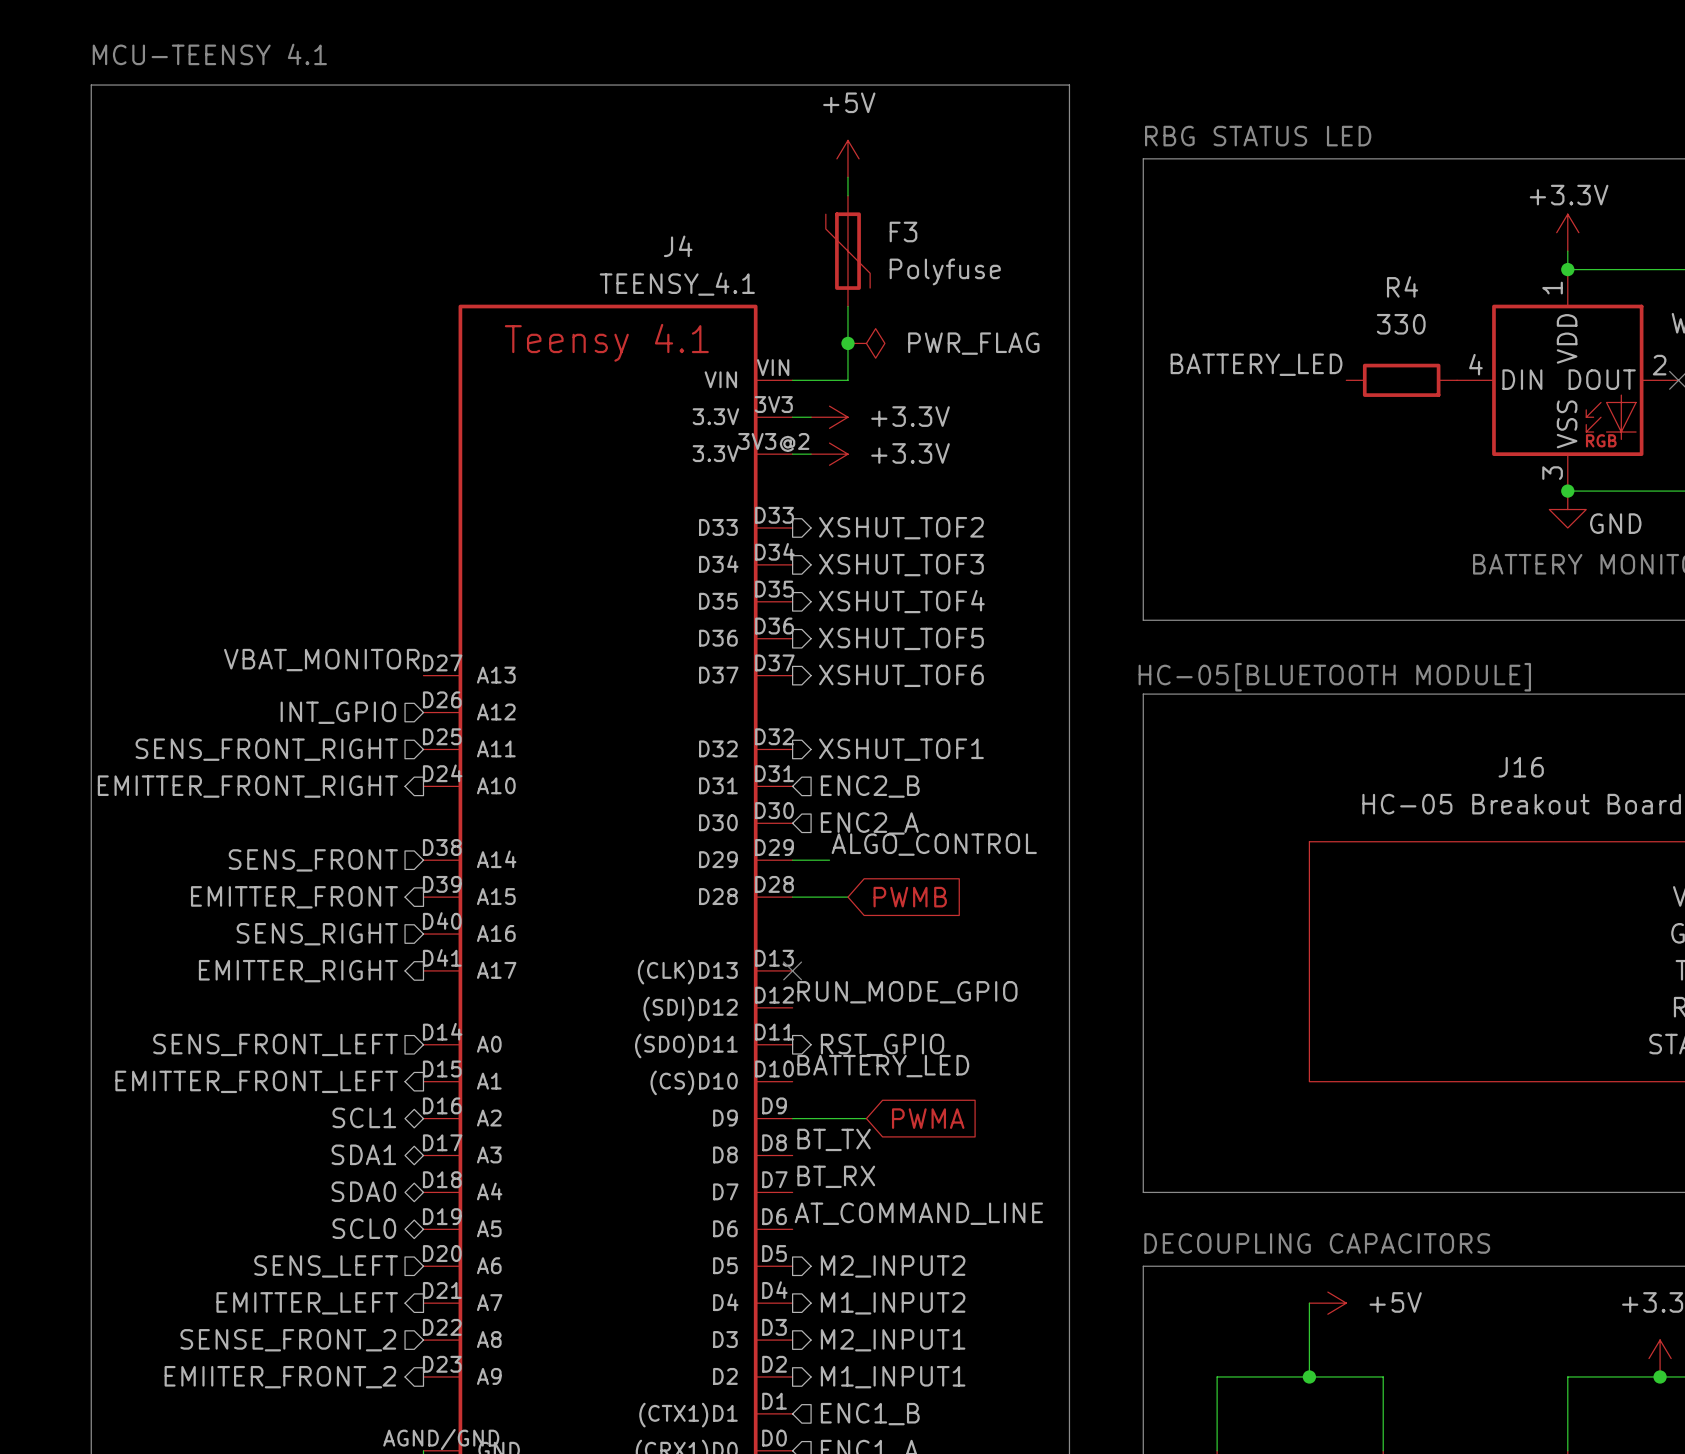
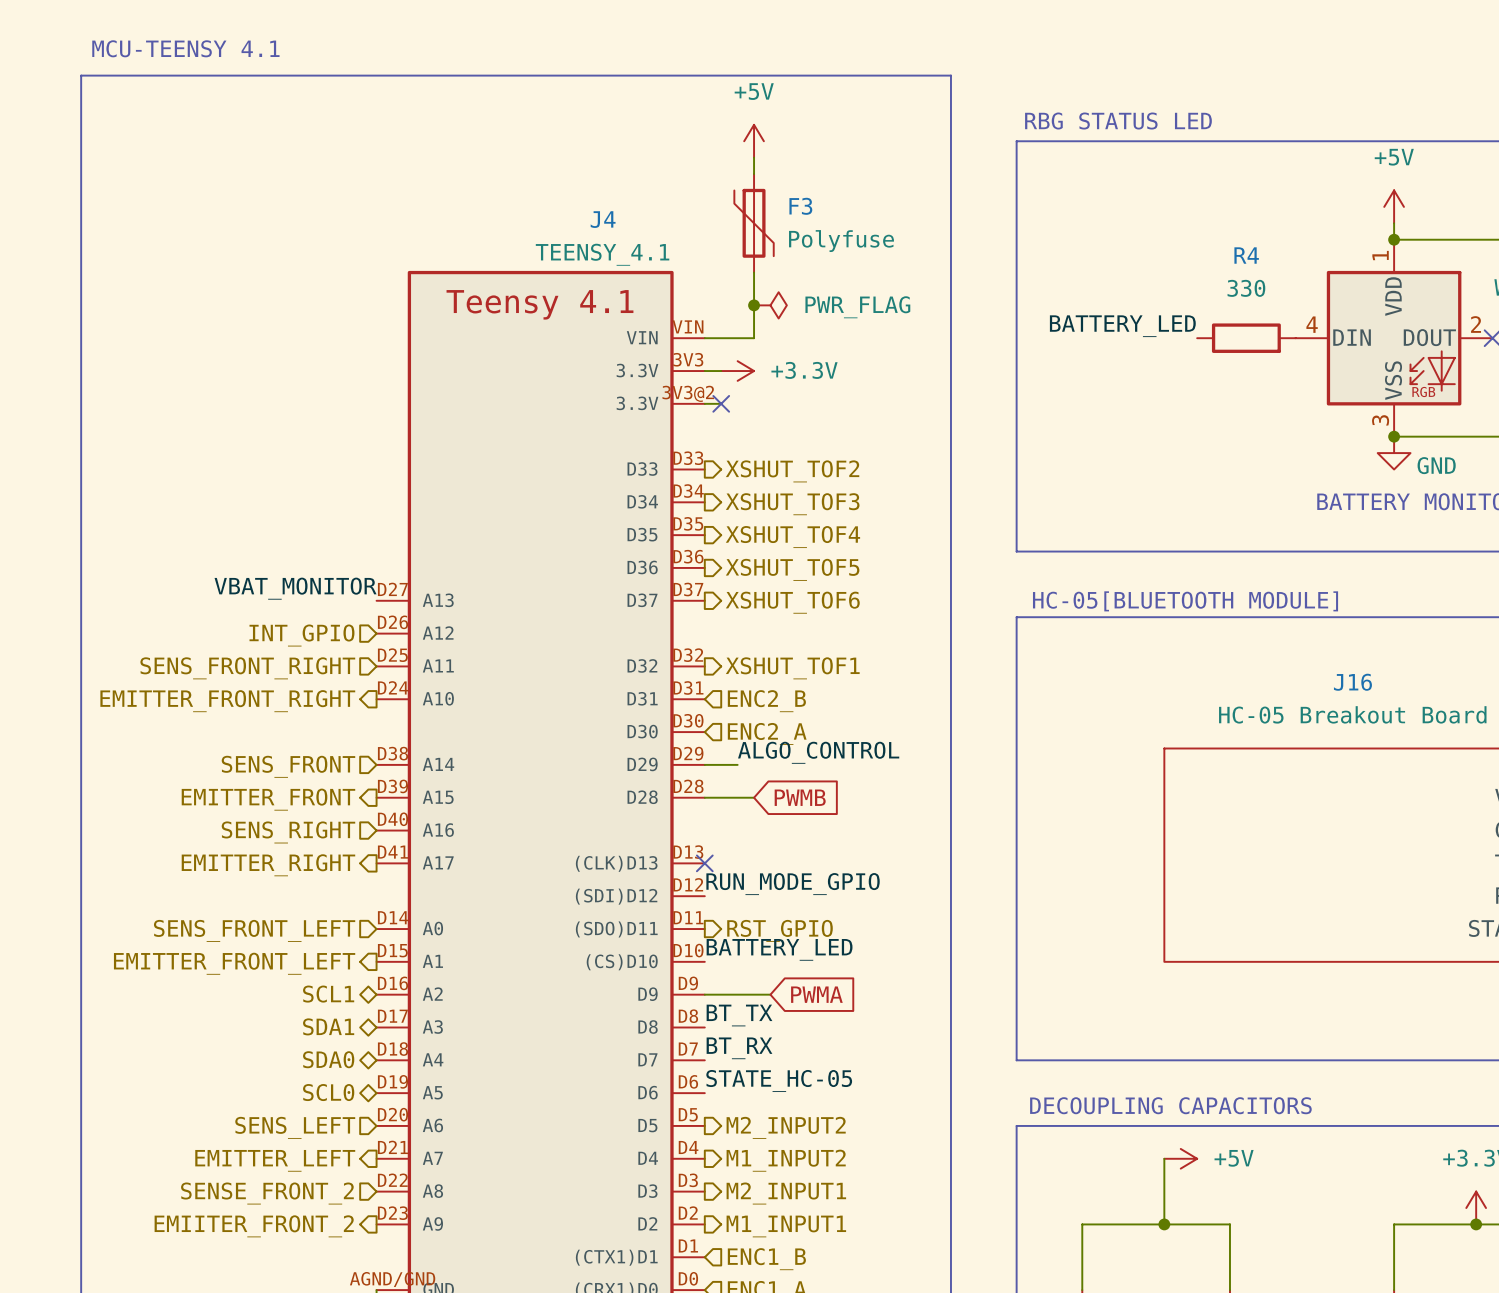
power symbol: +3.3V (1567, 232) -> +5V (1394, 206)
no-connect mark: none -> (721, 403)
power symbol: +3.3V (829, 454) -> none
label: AT_COMMAND_LINE (918, 1213) -> STATE_HC-05 (779, 1081)

